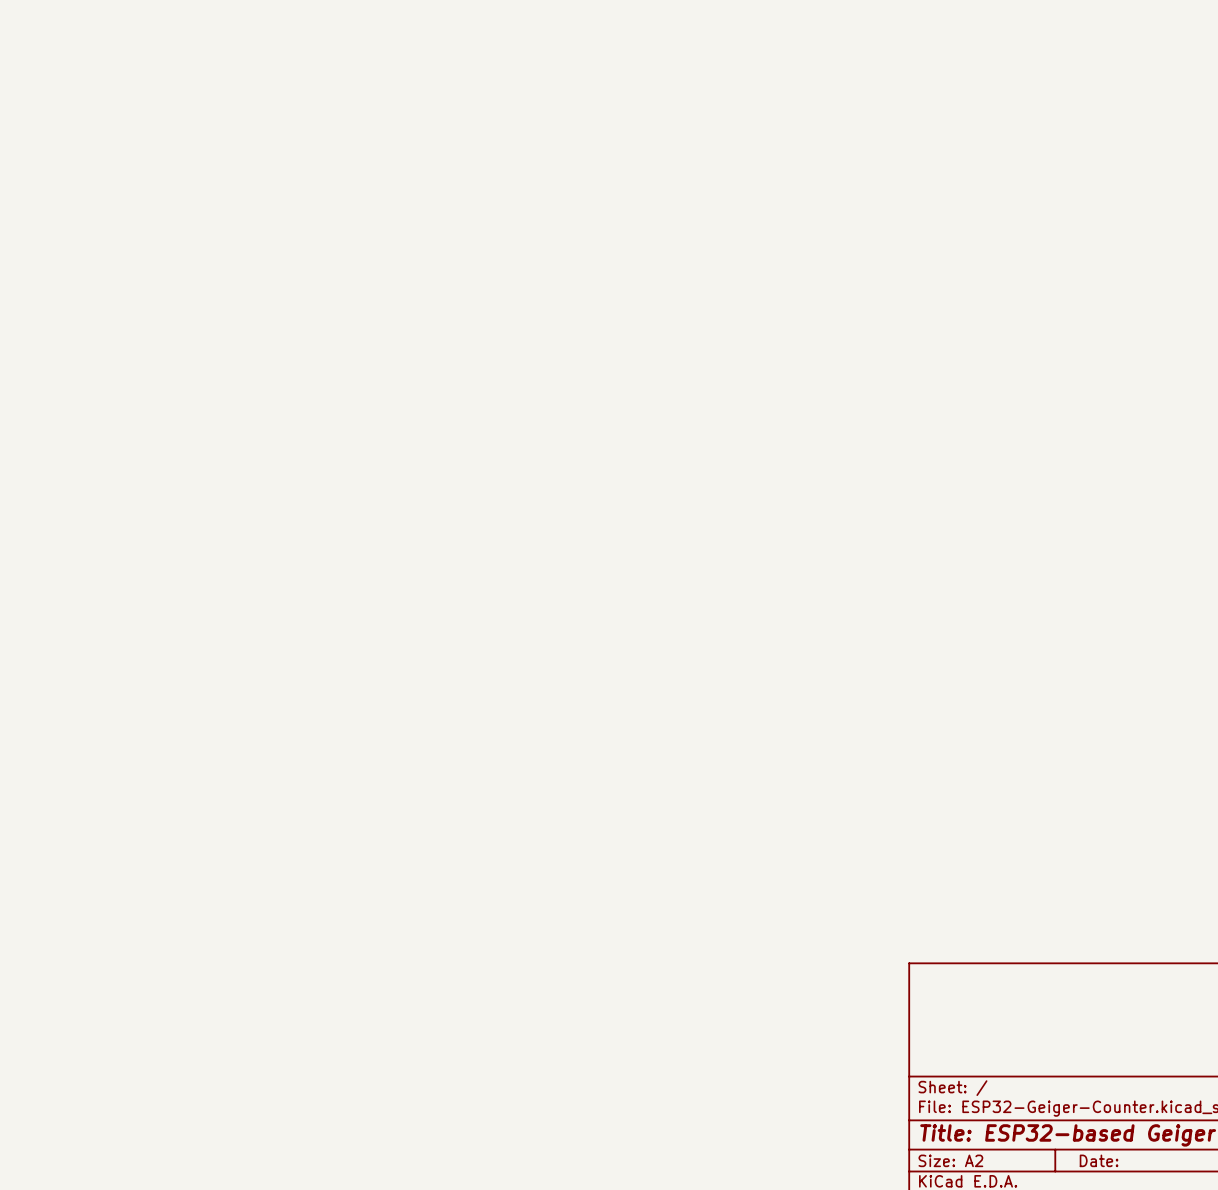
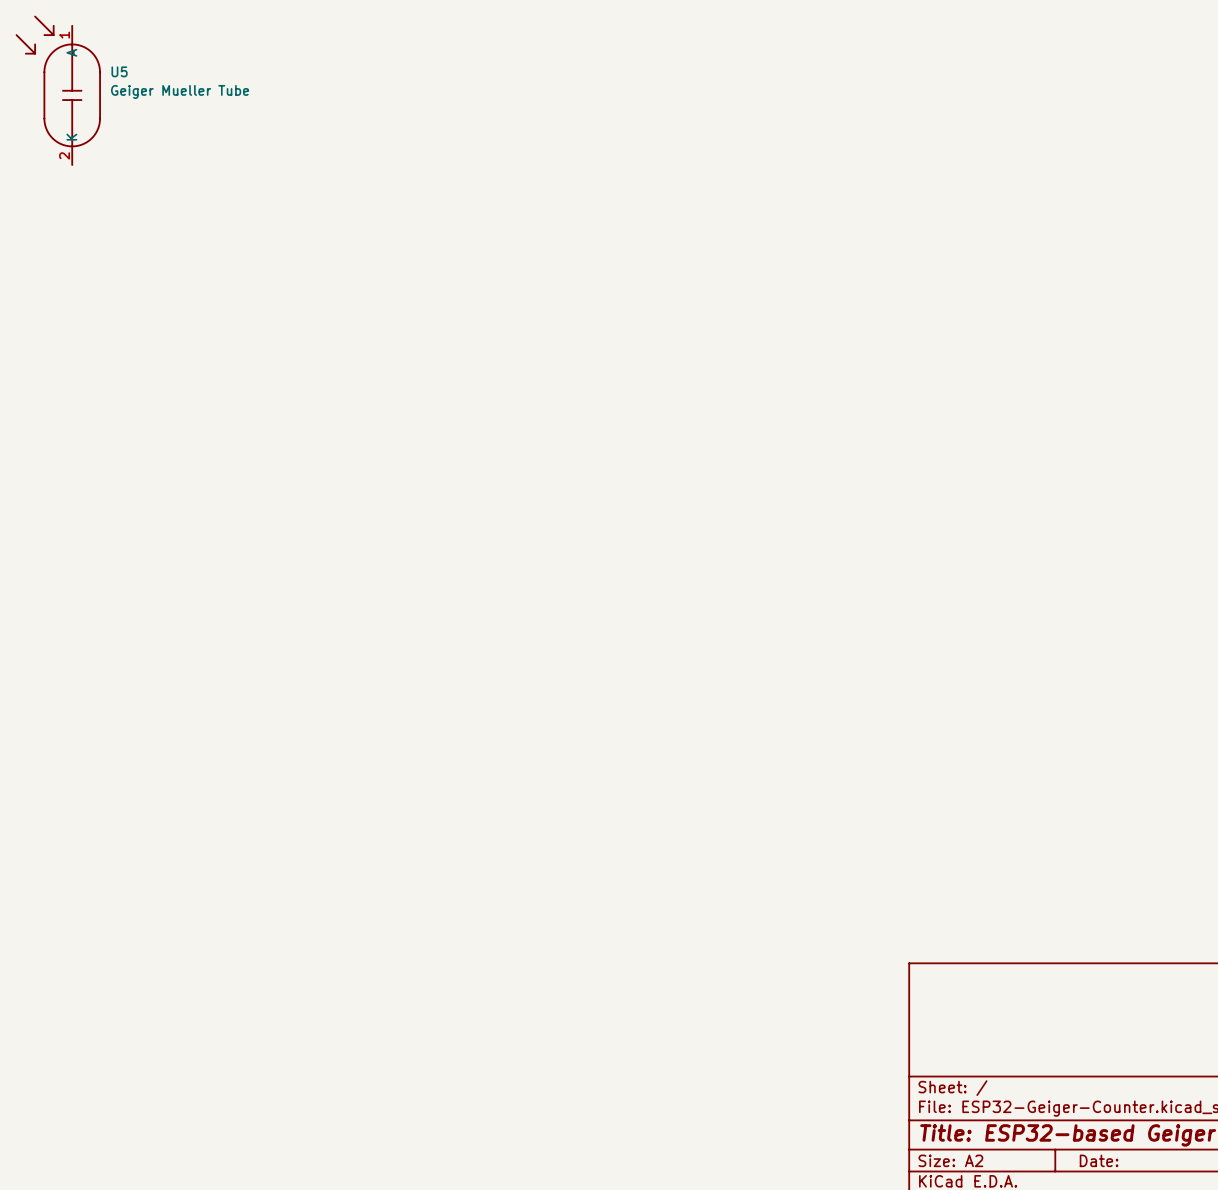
U5: none -> Geiger Mueller Tube (58, 90)

